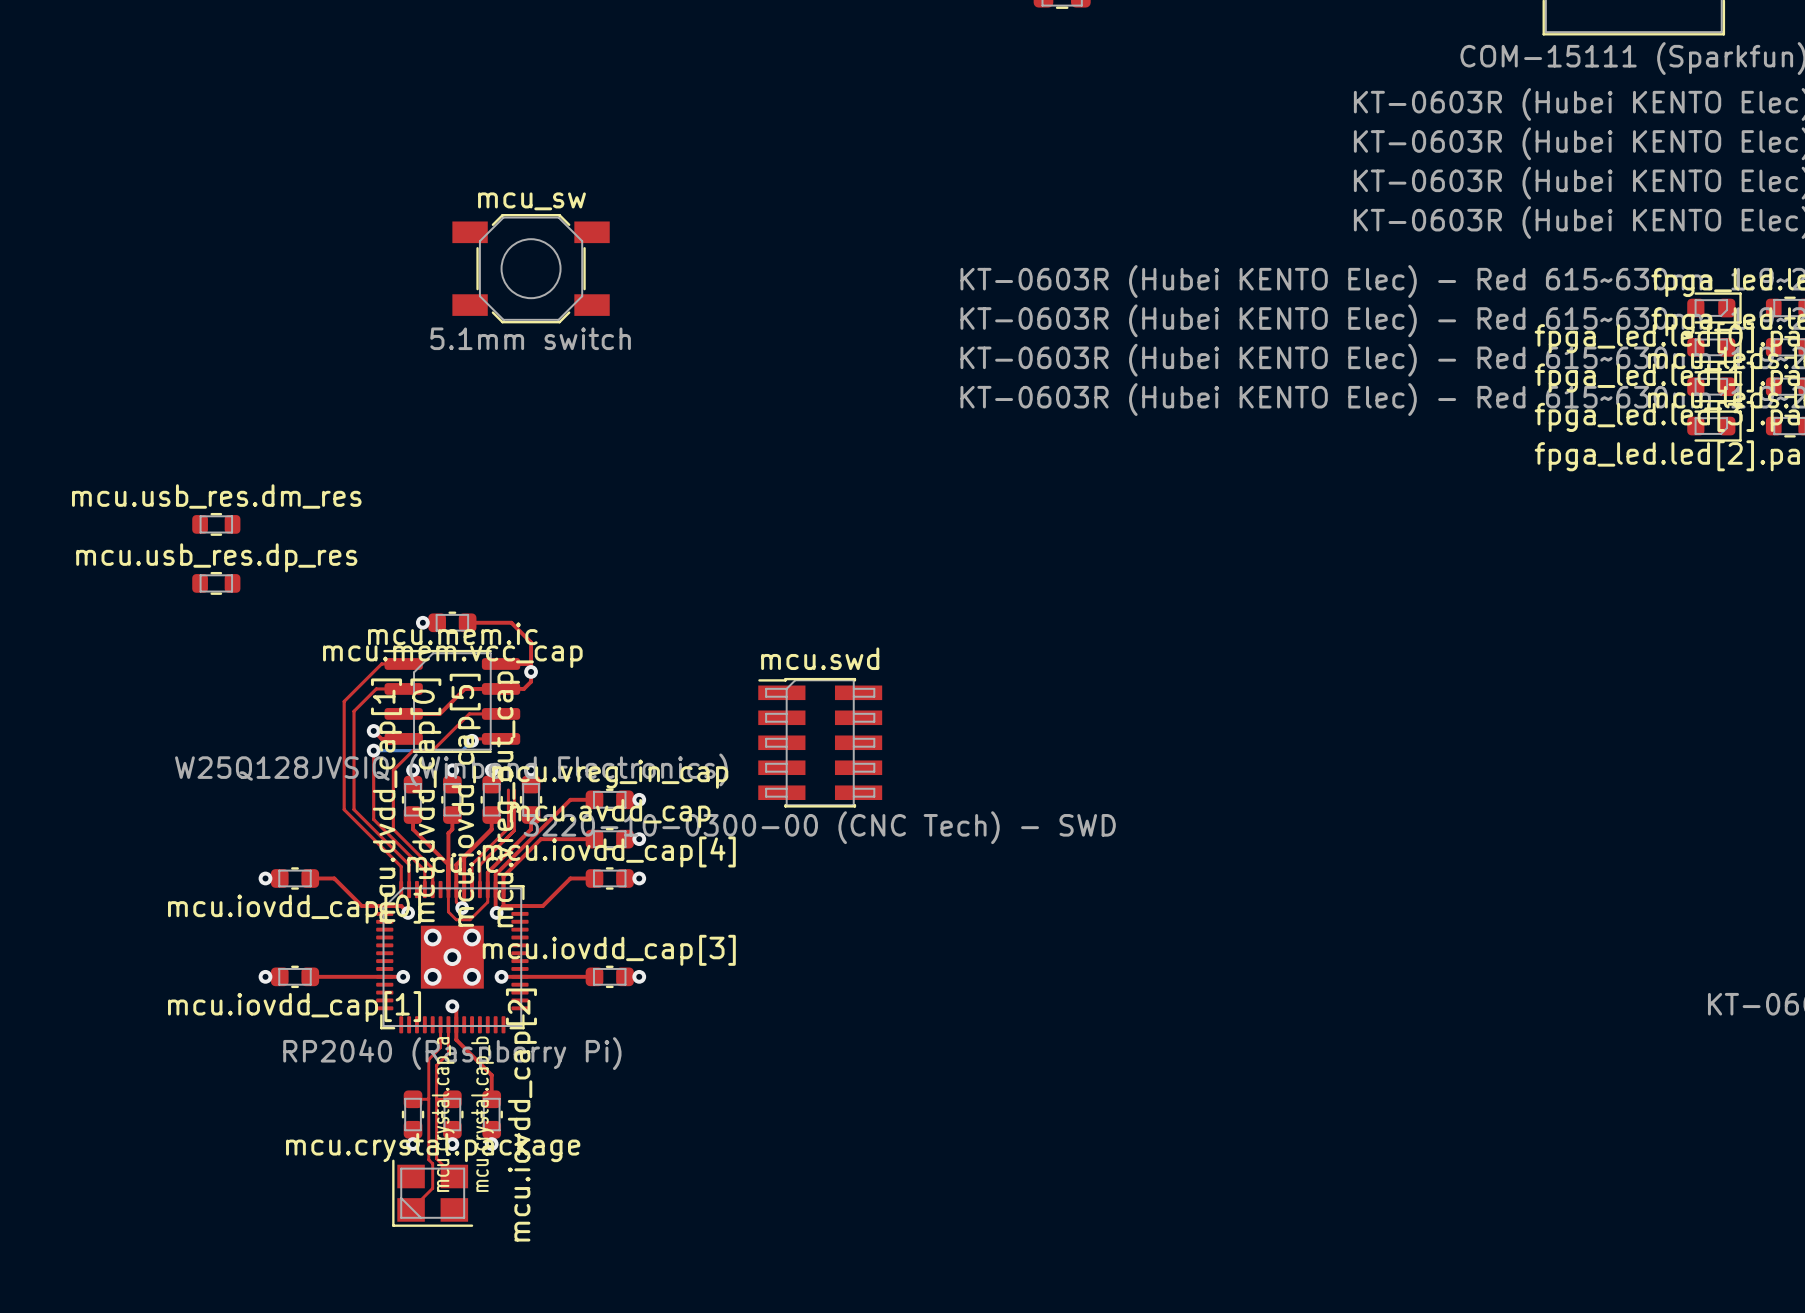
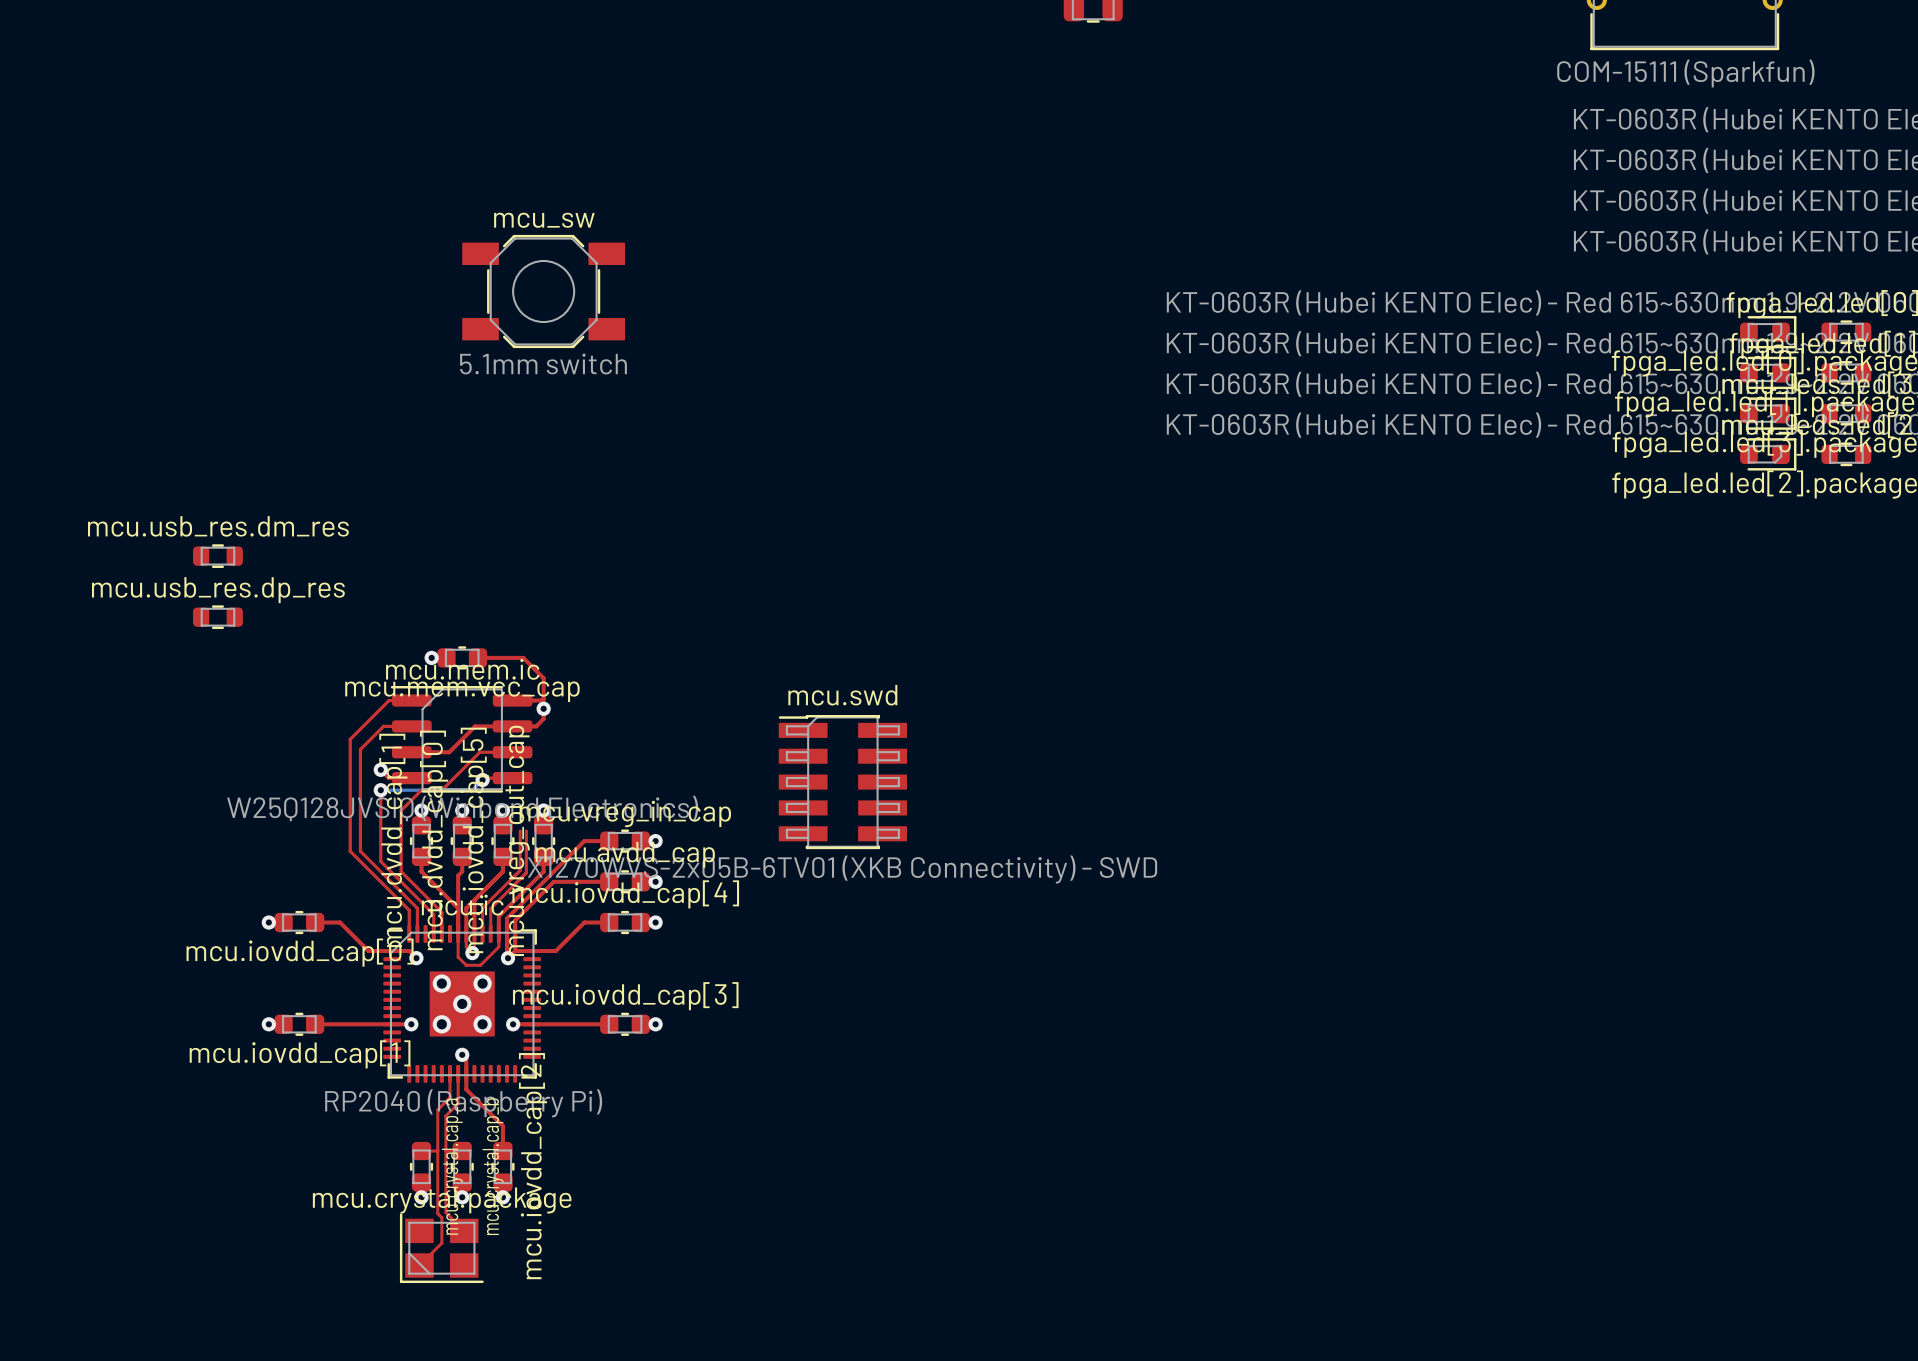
mcu.swd value: 3220-10-0300-00 (CNC Tech) - SWD (819, 827) -> X1270WVS-2x05B-6TV01 (XKB Connectivity) - SWD (842, 869)

